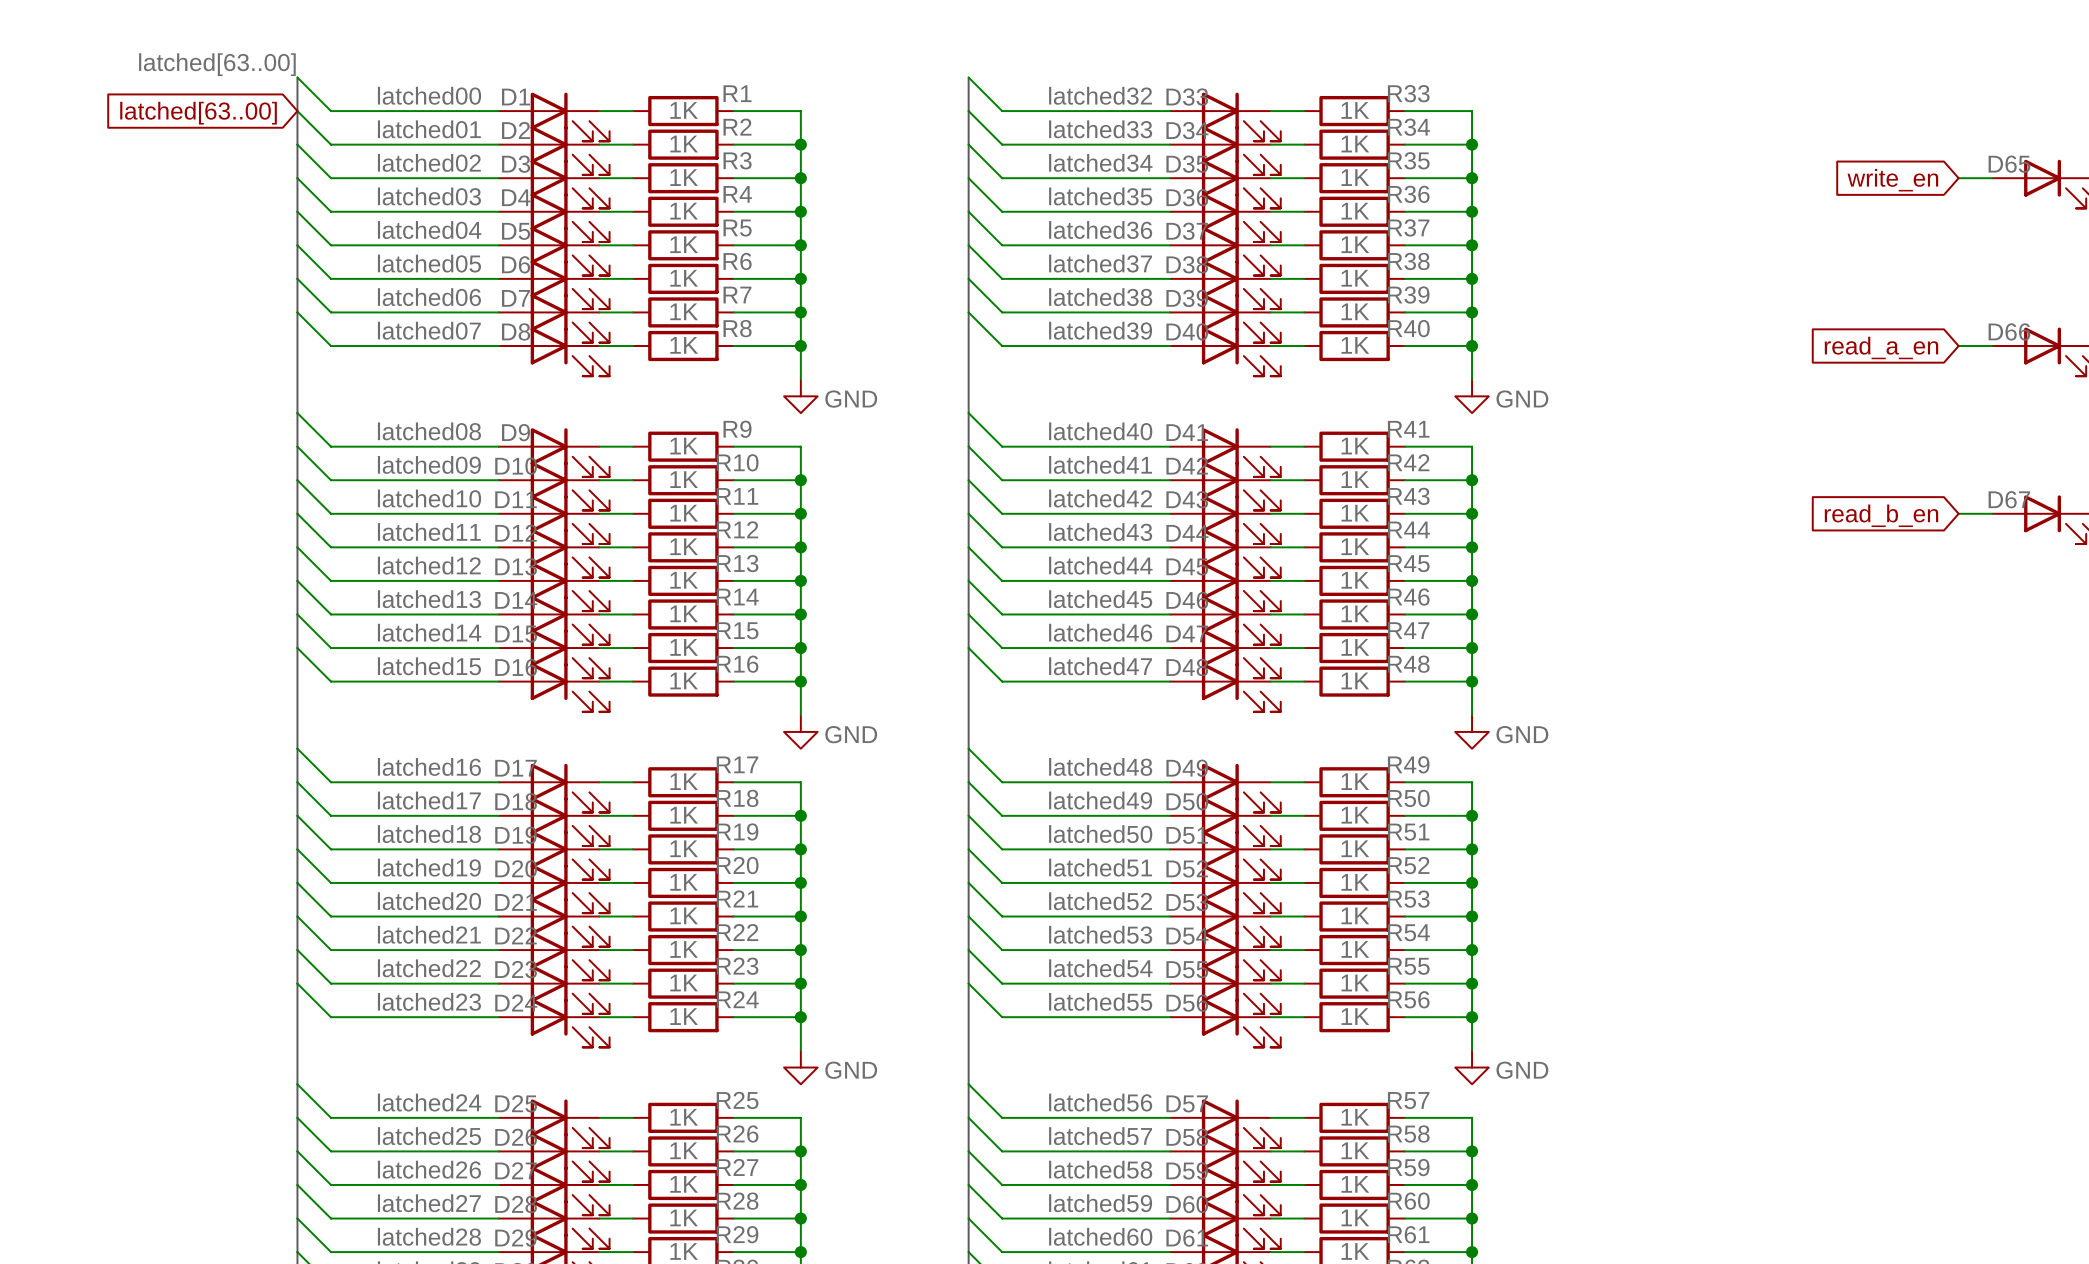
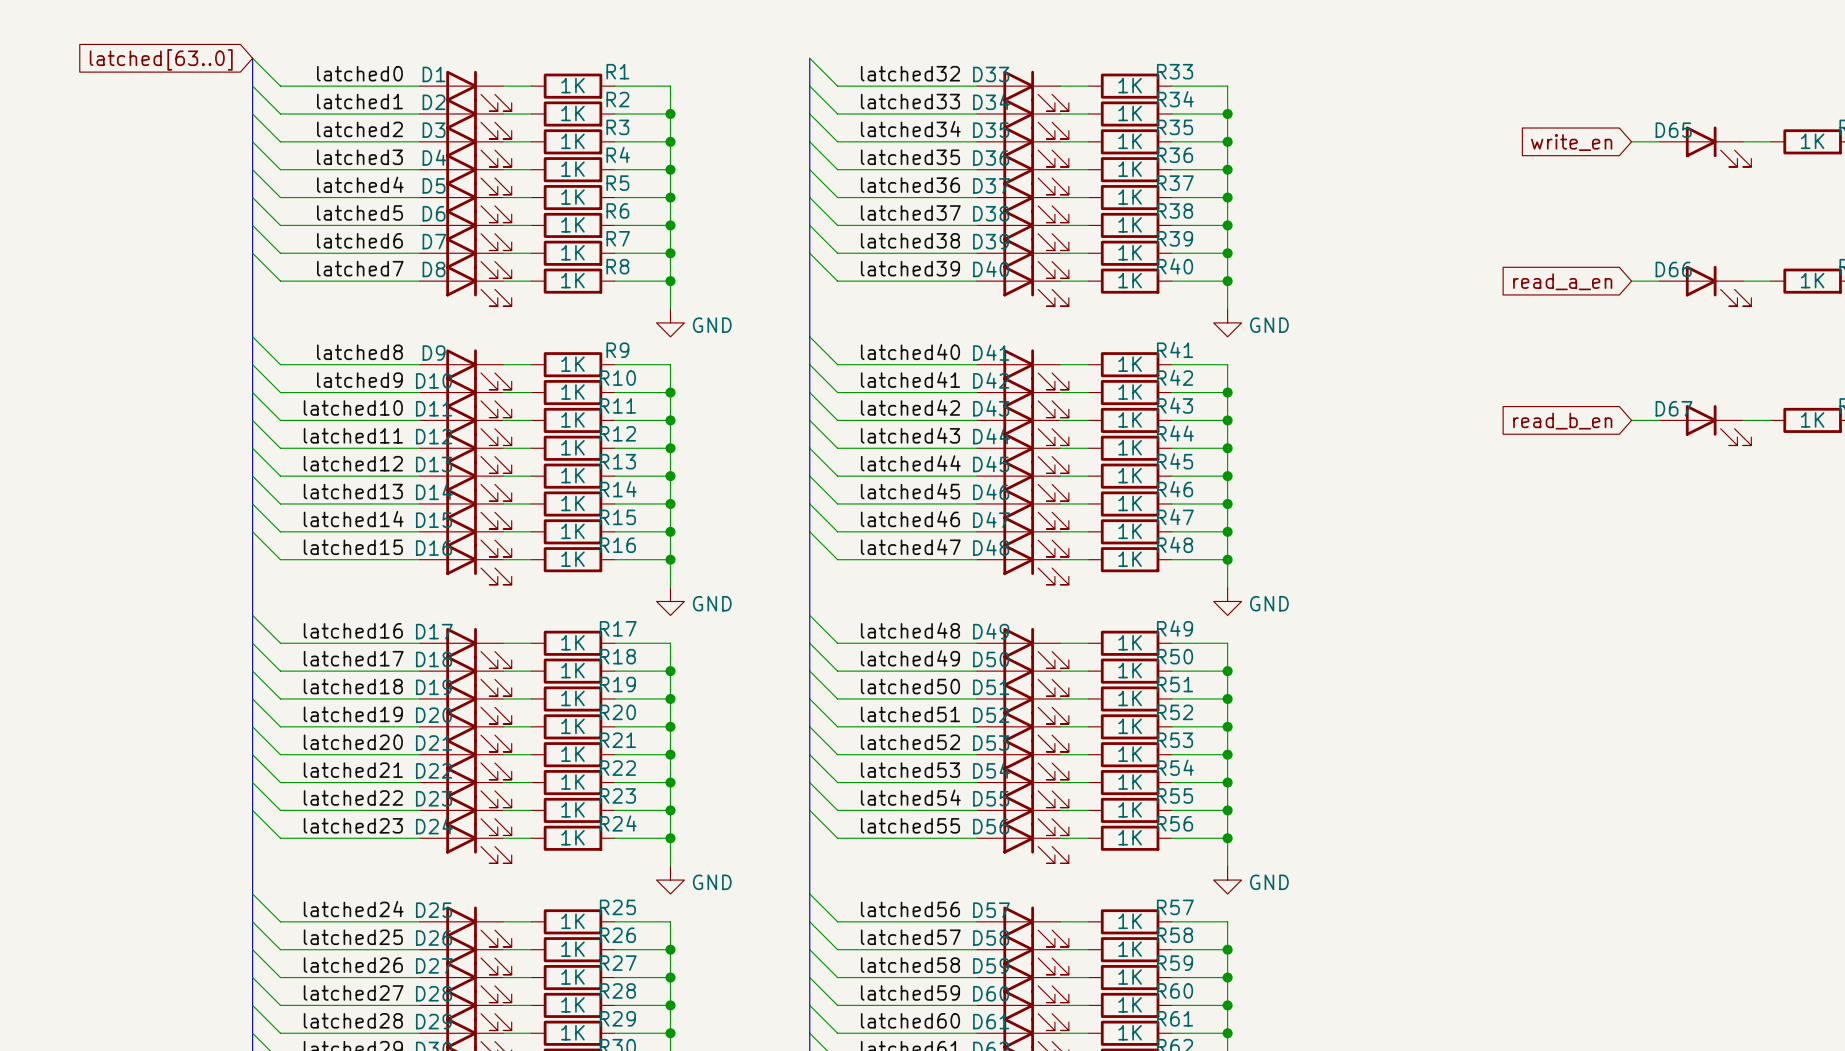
label: latched[63..00] (217, 64) -> none
label: latched00 (429, 95) -> latched0 (359, 73)
global label: latched[63..00] (198, 113) -> latched[63..0] (161, 59)
label: latched01 (429, 129) -> latched1 (359, 101)
label: latched02 (429, 162) -> latched2 (359, 129)
label: latched03 (429, 196) -> latched3 (359, 157)
label: latched04 (429, 230) -> latched4 (360, 184)
label: latched05 (429, 263) -> latched5 (359, 212)
label: latched06 (429, 297) -> latched6 (359, 240)
label: latched07 (429, 330) -> latched7 (360, 268)
label: latched08 (429, 431) -> latched8 (359, 352)
label: latched09 (429, 464) -> latched9 (359, 380)

